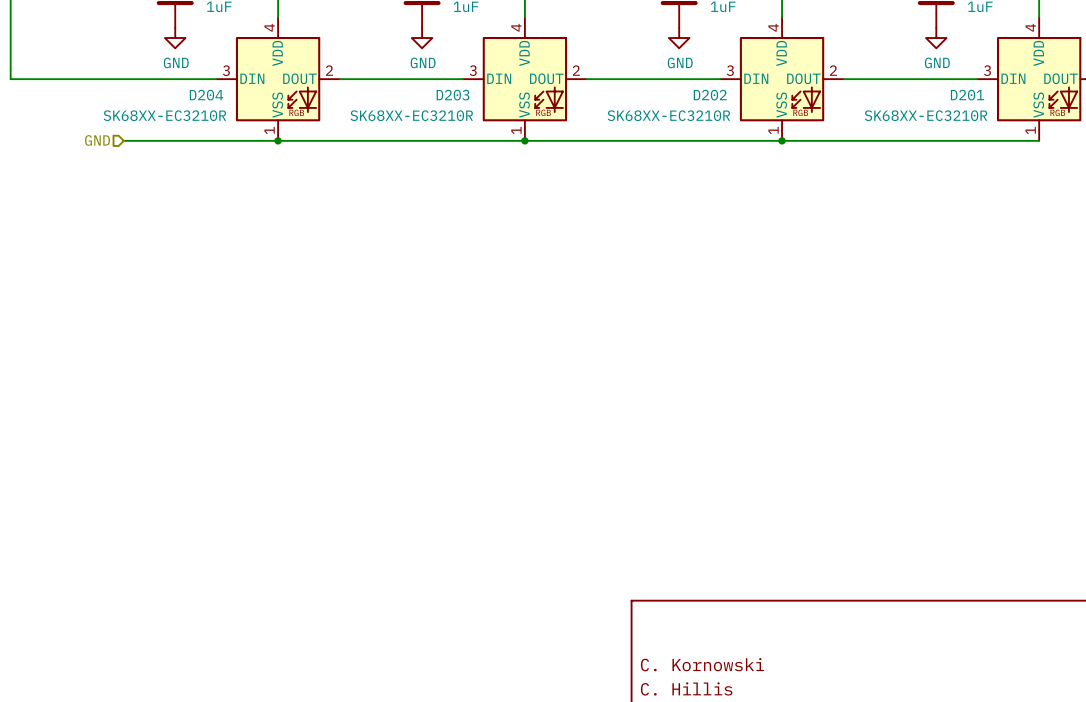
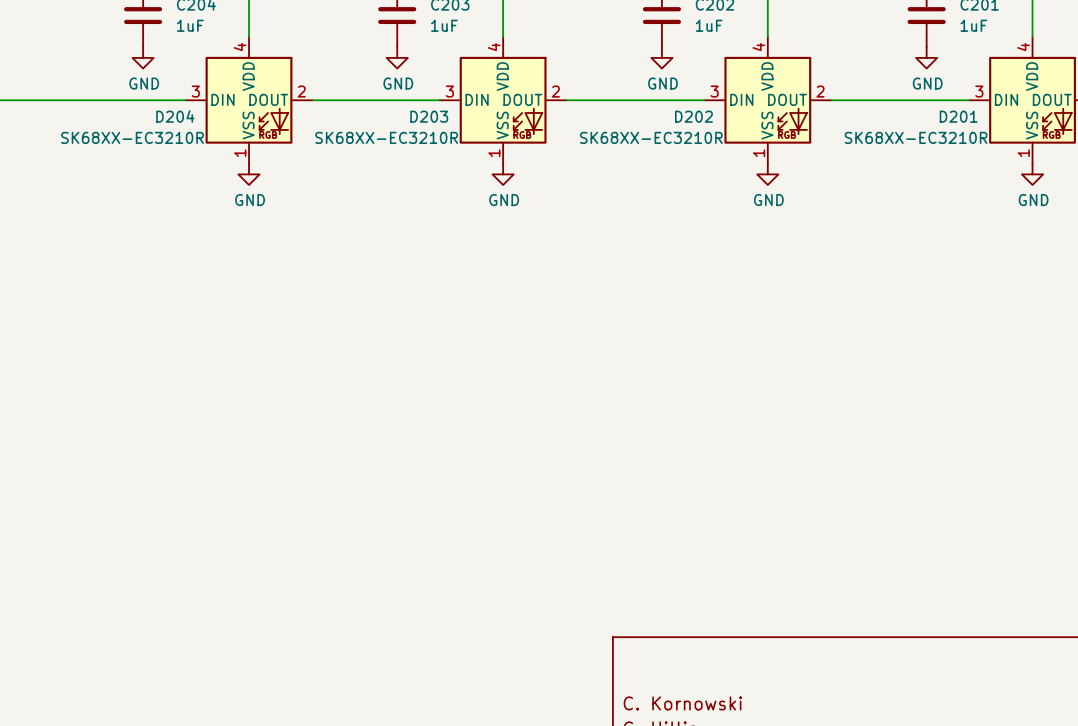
hierarchical label: GND (97, 140) -> none
wire: (123, 140) (1039, 140) -> none
junction: (278, 140) -> none
junction: (524, 140) -> none
junction: (782, 140) -> none
power symbol: none -> GND (249, 174)
power symbol: none -> GND (503, 174)
power symbol: none -> GND (767, 174)
power symbol: none -> GND (1032, 174)

